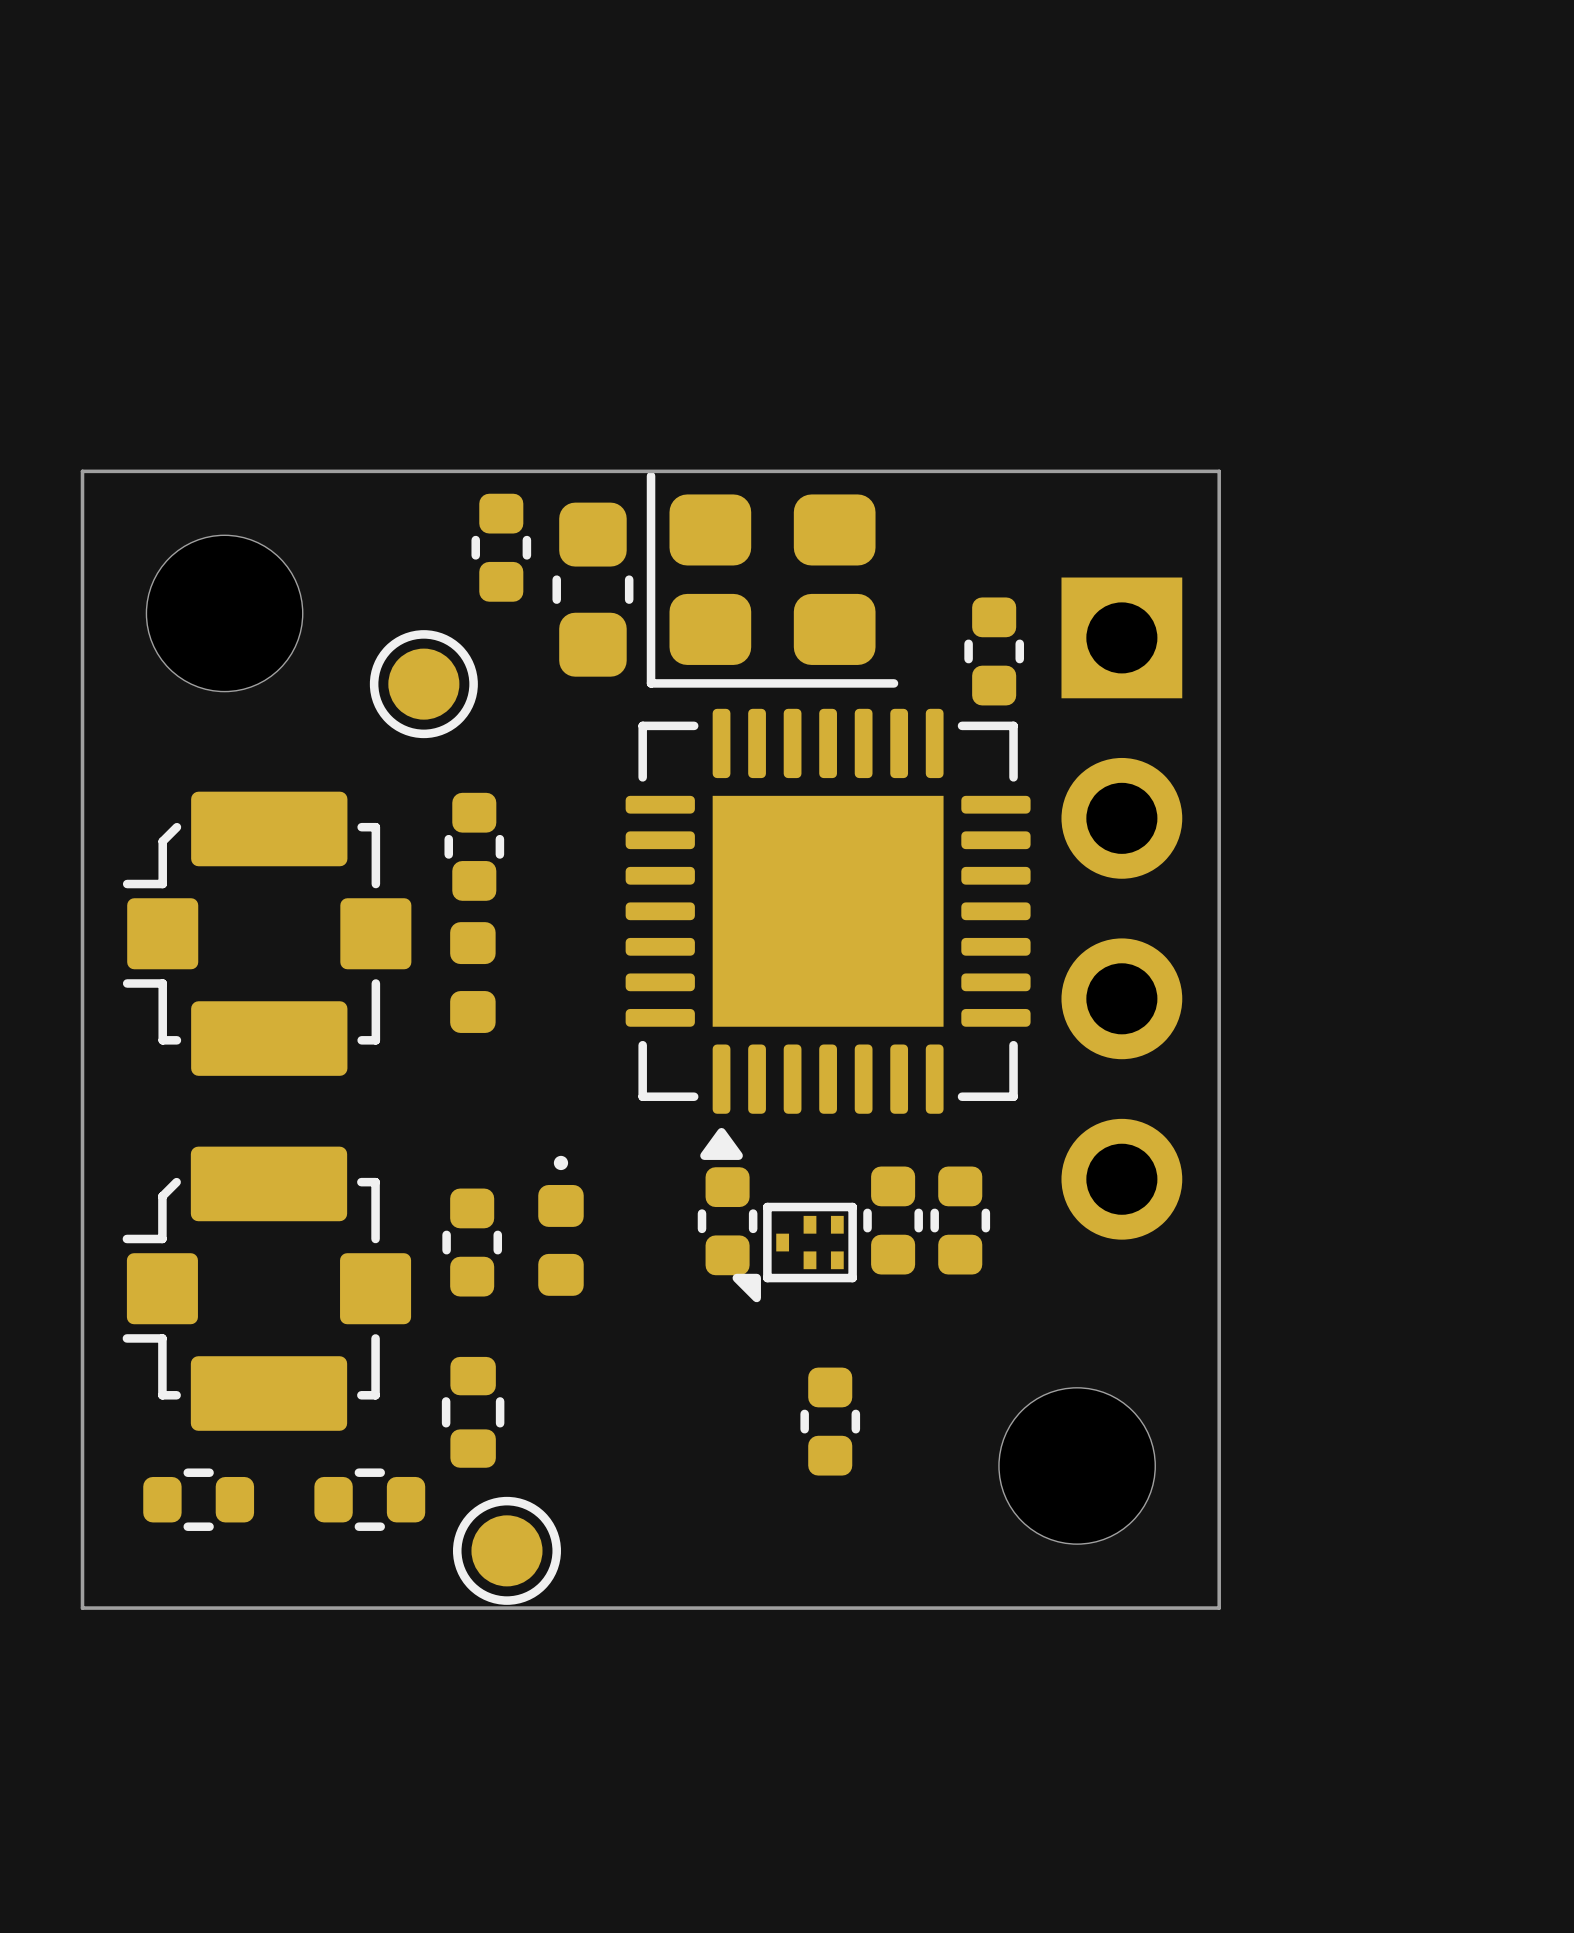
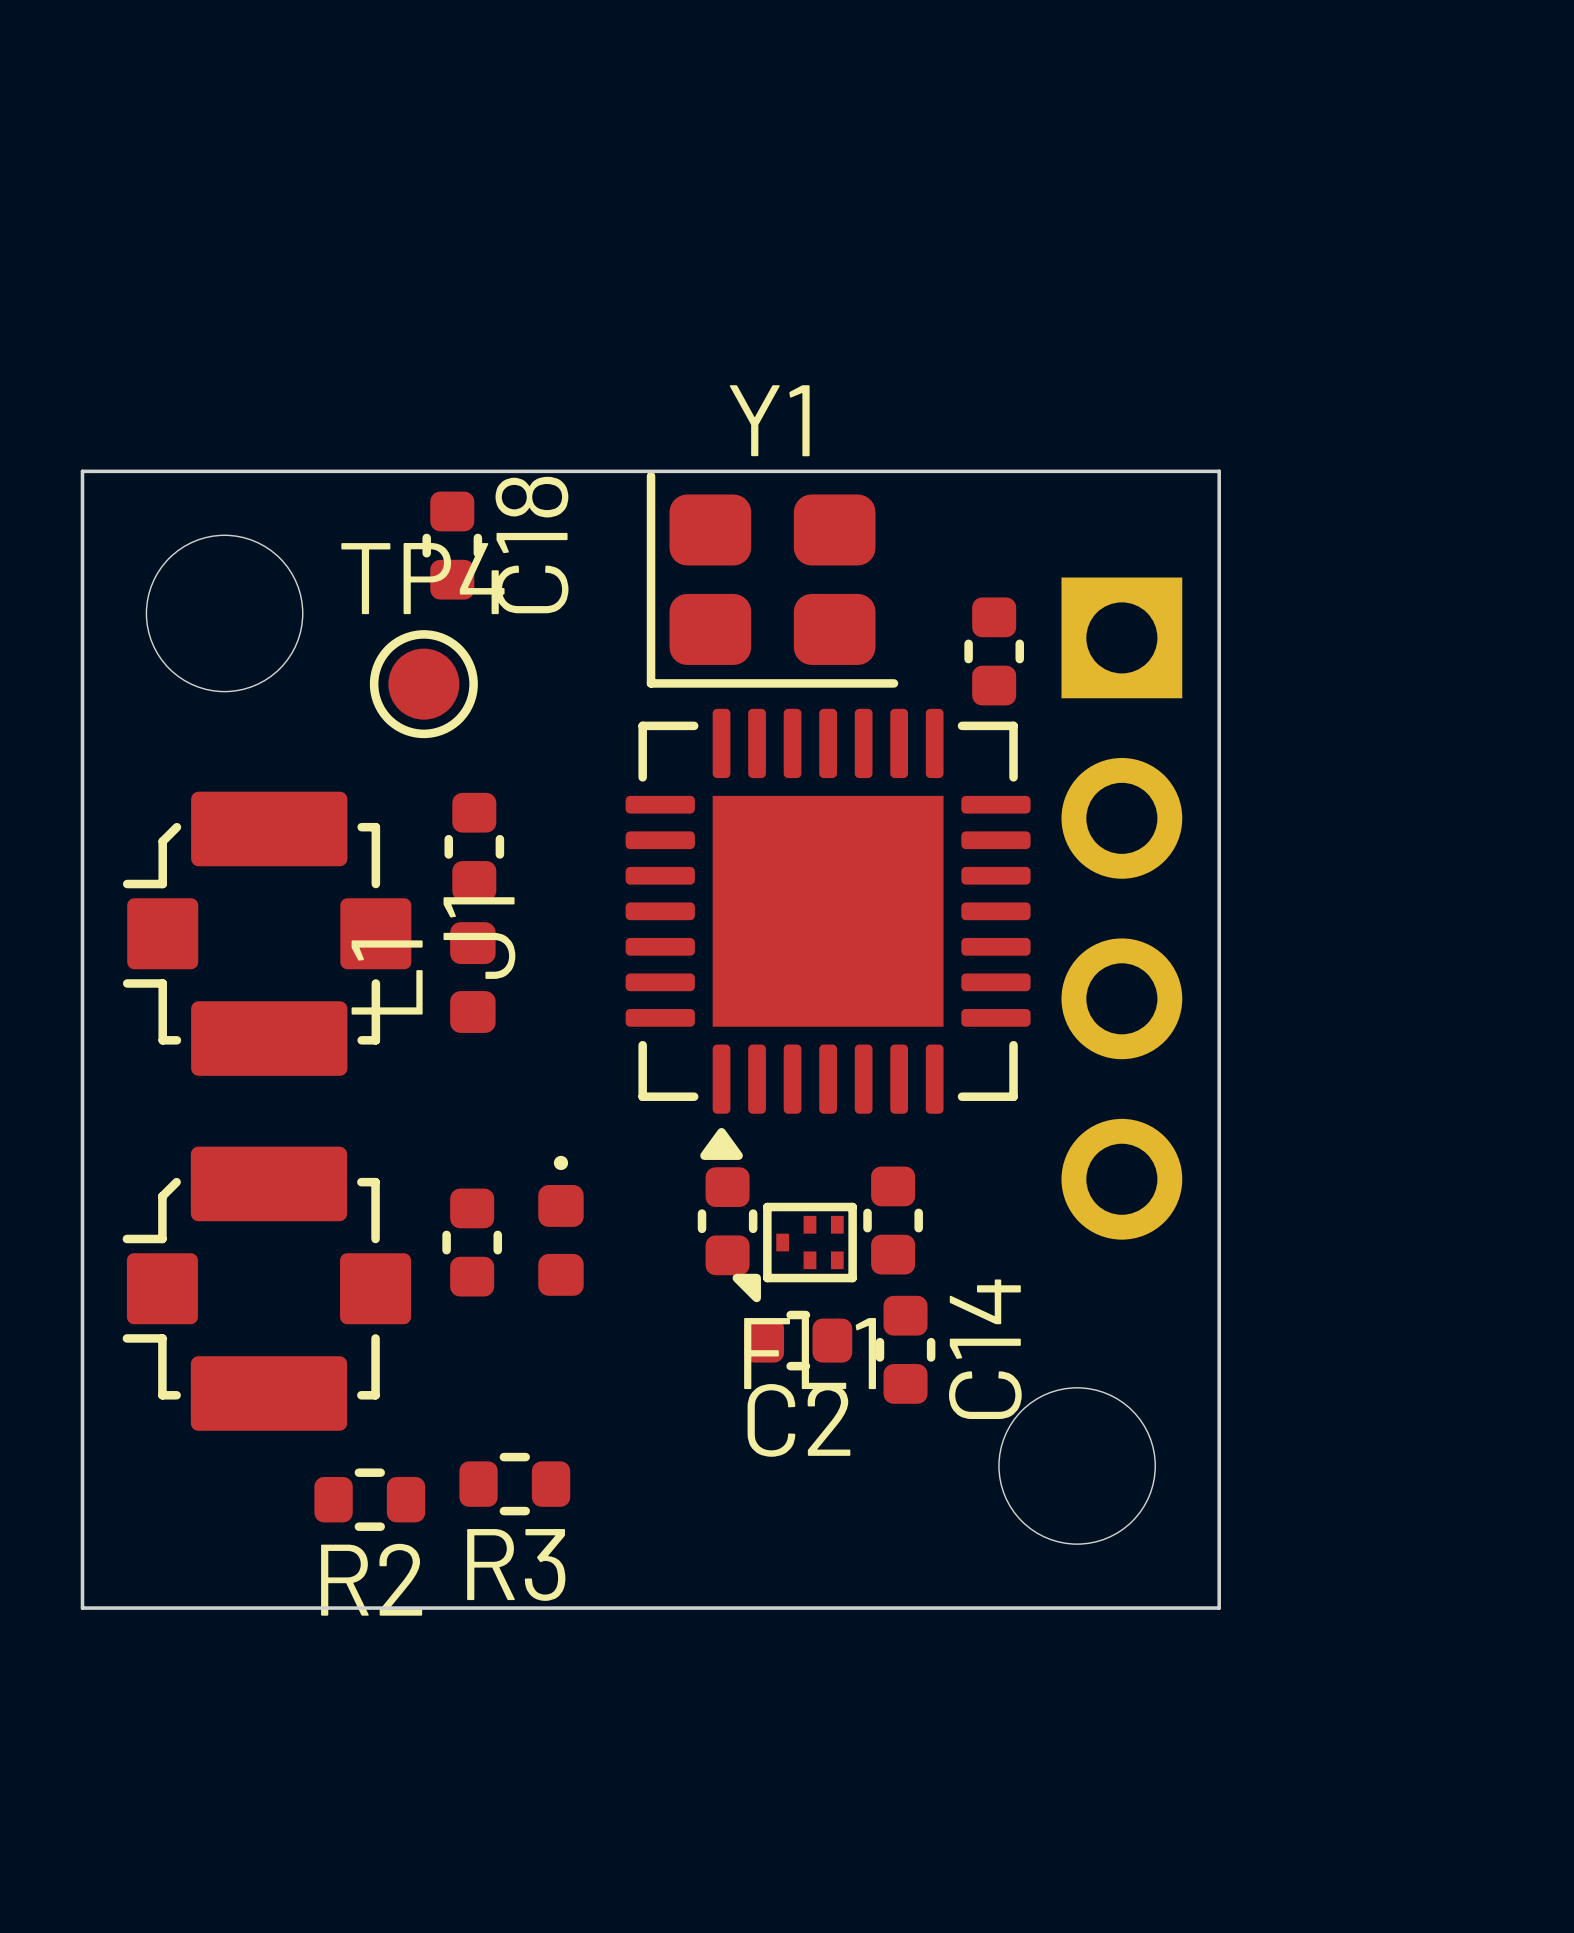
Y1 name: none -> Y1 (769, 420)
C18 name: none -> C18 (531, 545)
C18 position: (501, 547) -> (452, 545)
TP4 name: none -> TP4 (422, 578)
part: (592, 589) -> none
J1 name: none -> J1 (479, 938)
L1 name: none -> L1 (387, 977)
part: (960, 1220) -> none
C2: none -> (798, 1340)
C14: none -> (905, 1349)
FL1 name: none -> FL1 (810, 1353)
part: (473, 1412) -> none
part: (830, 1421) -> none
R3: none -> (514, 1484)
part: (198, 1499) -> none
part: (506, 1550) -> none
R2 name: none -> R2 (371, 1579)

